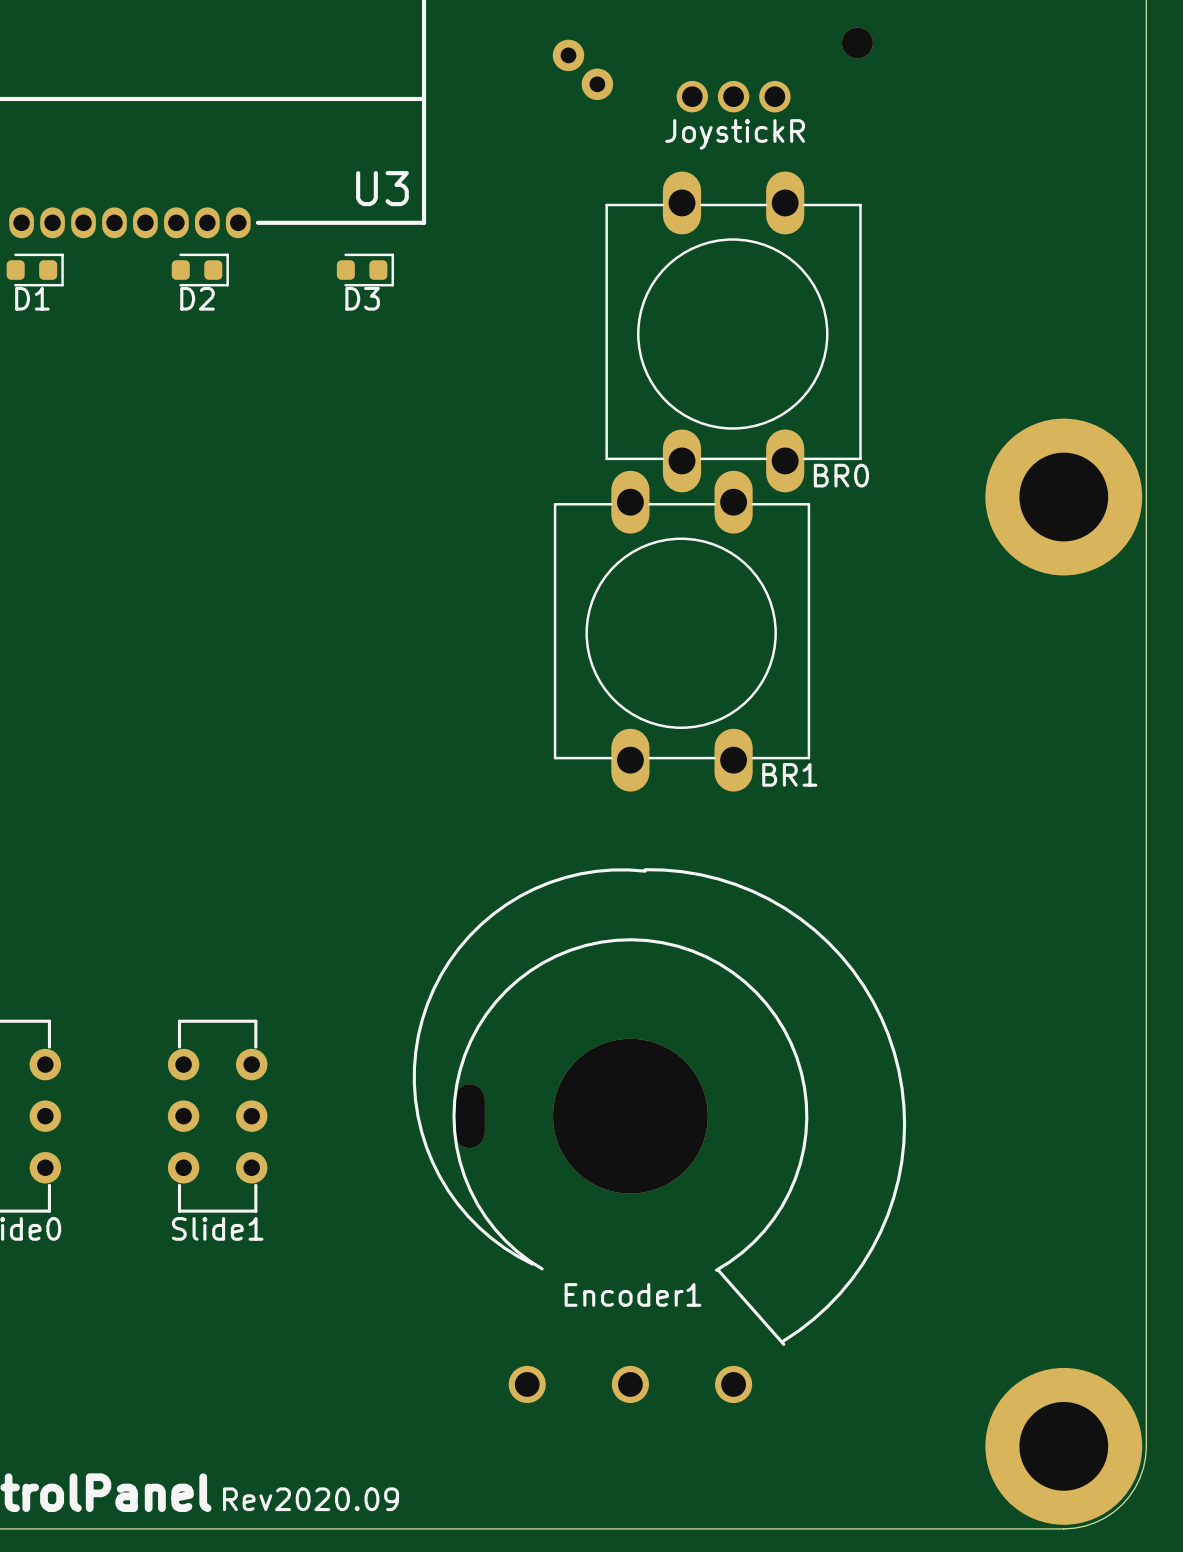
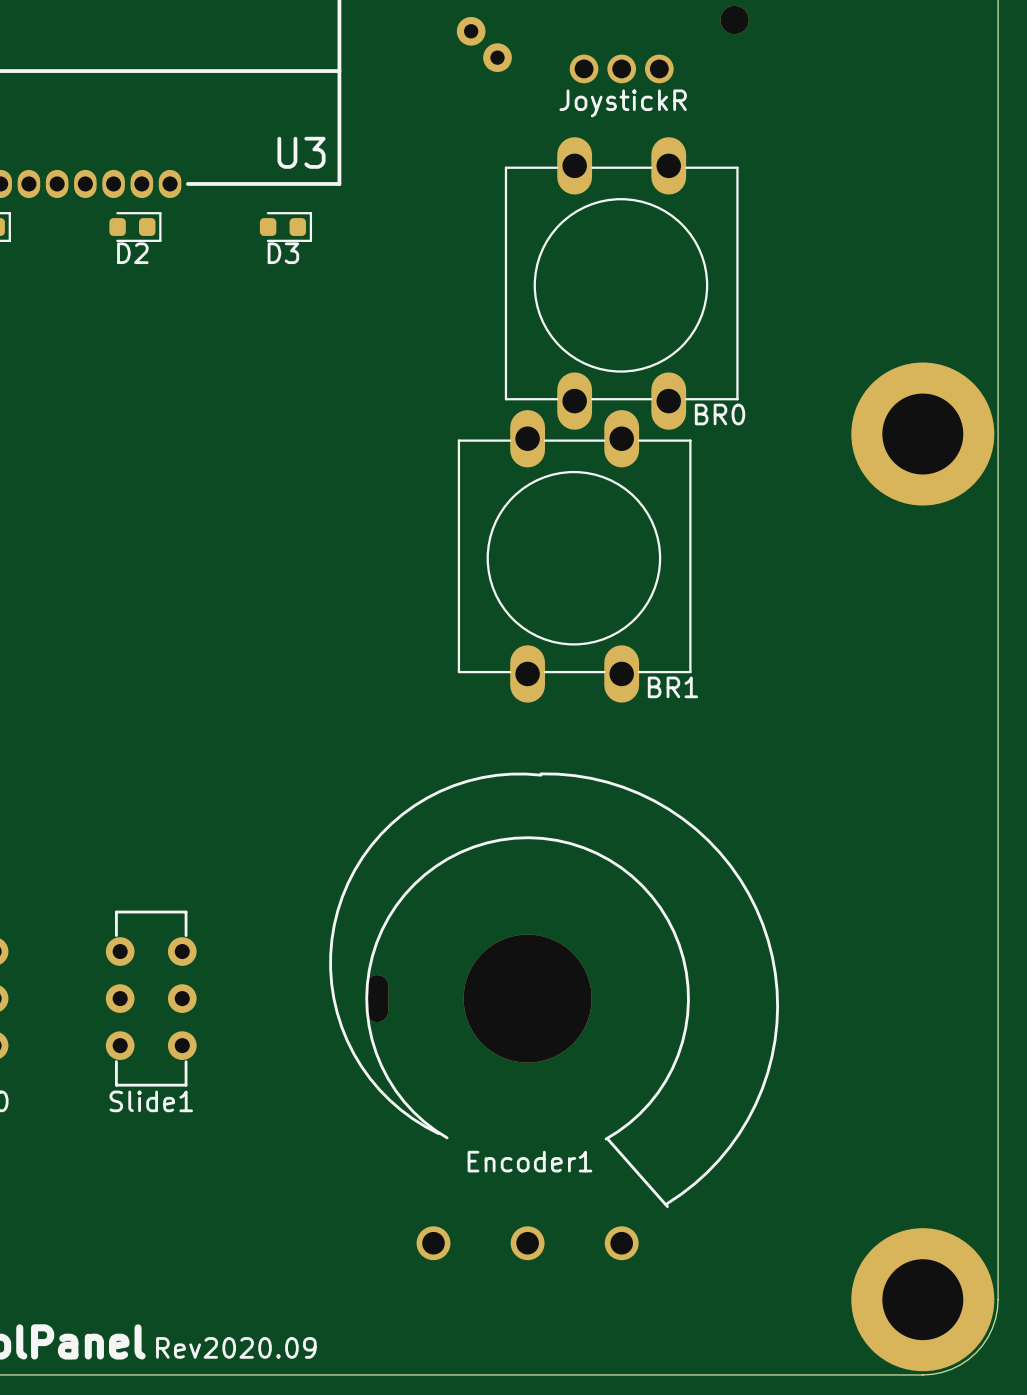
Encoder1 footprint: [412, 868, 907, 1404] -> [329, 772, 780, 1261]

